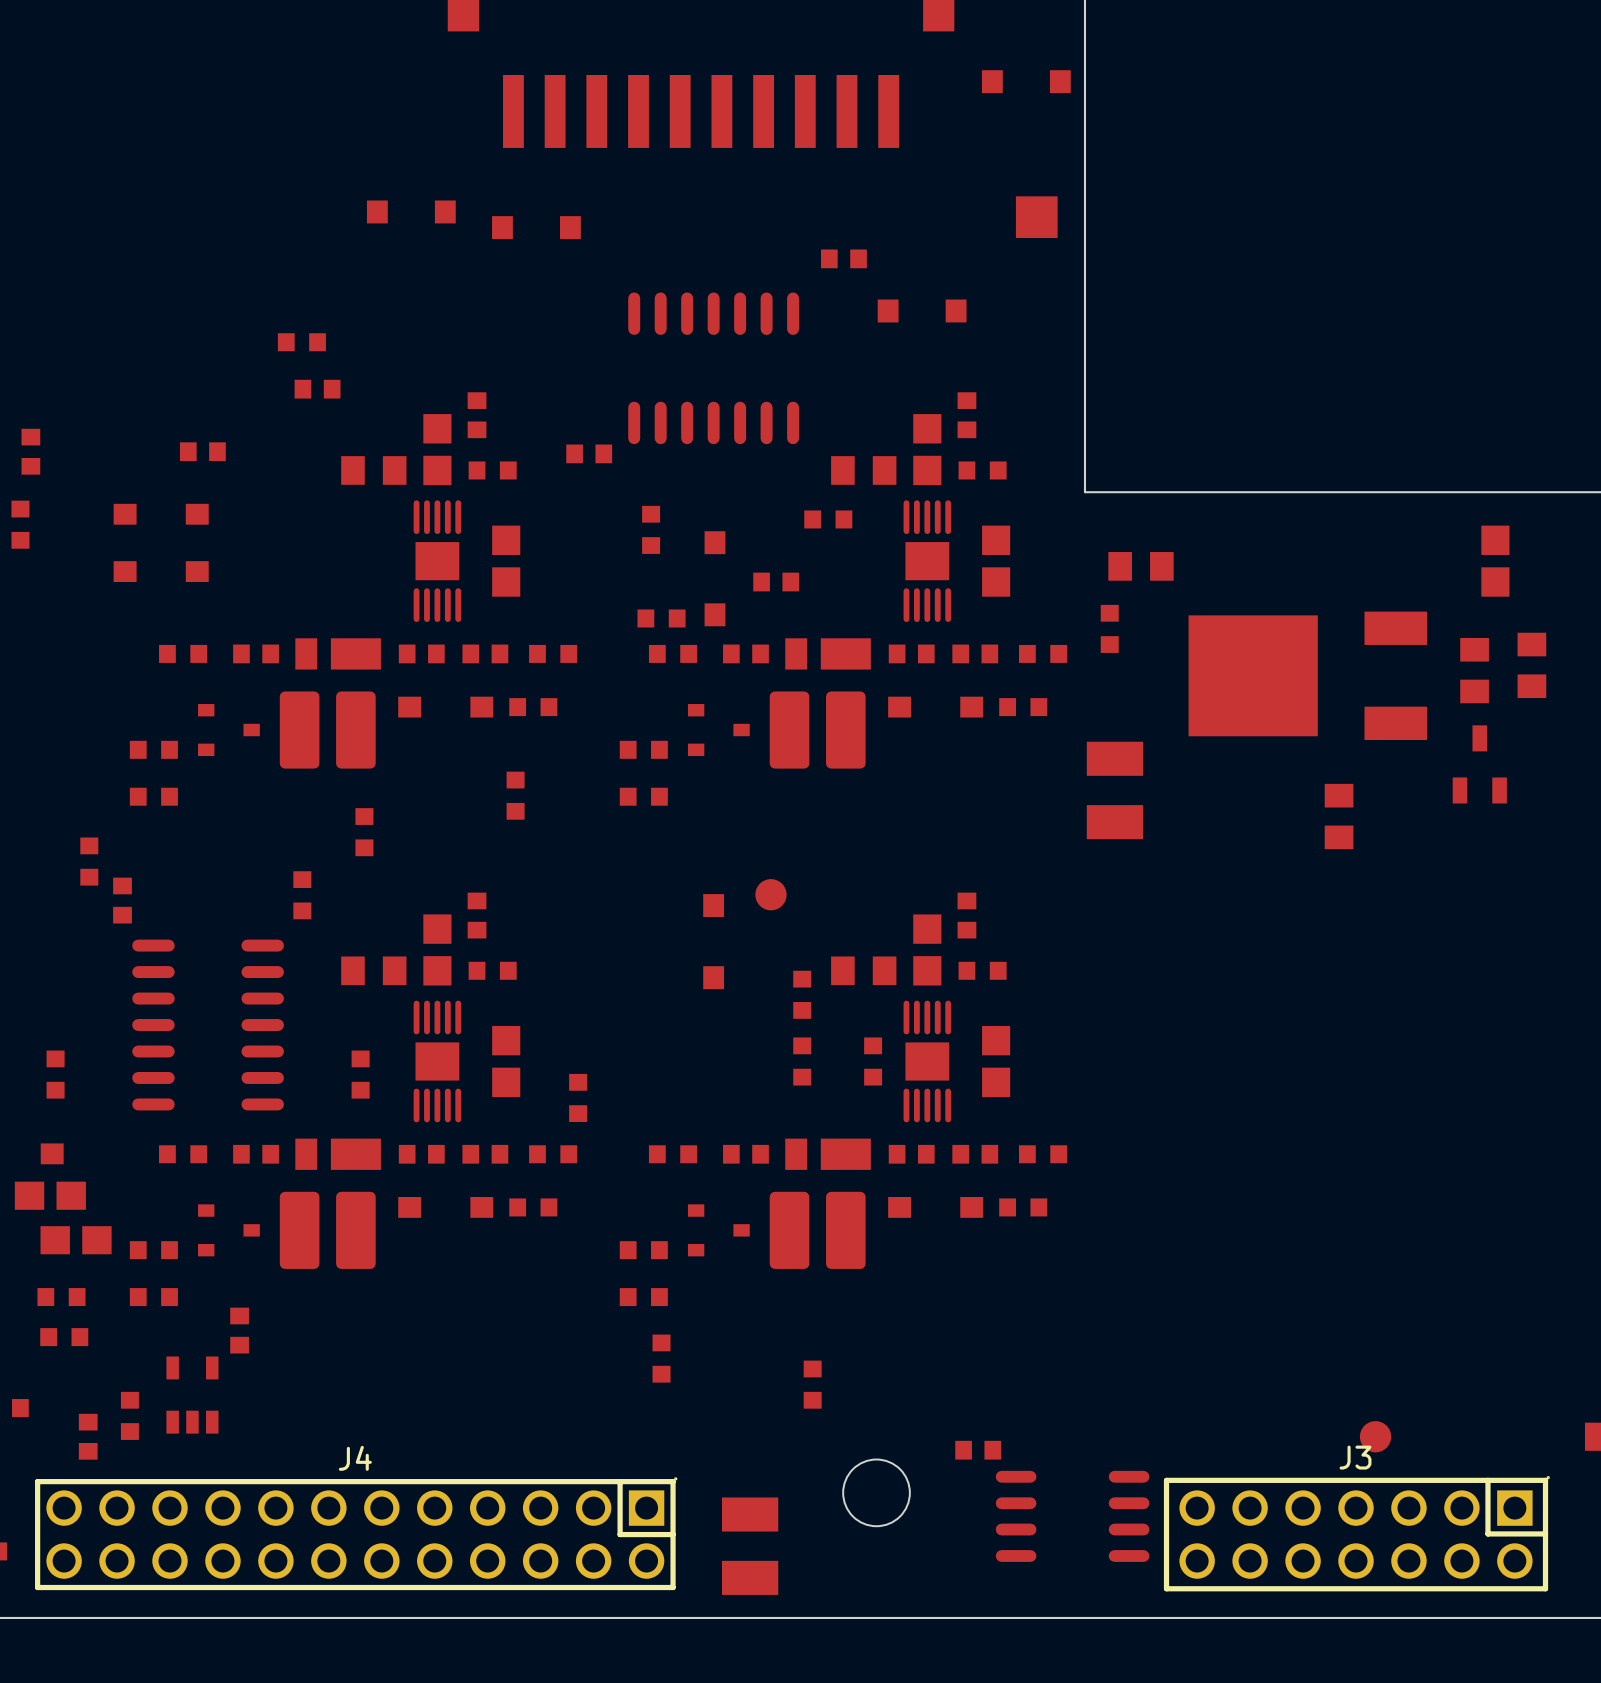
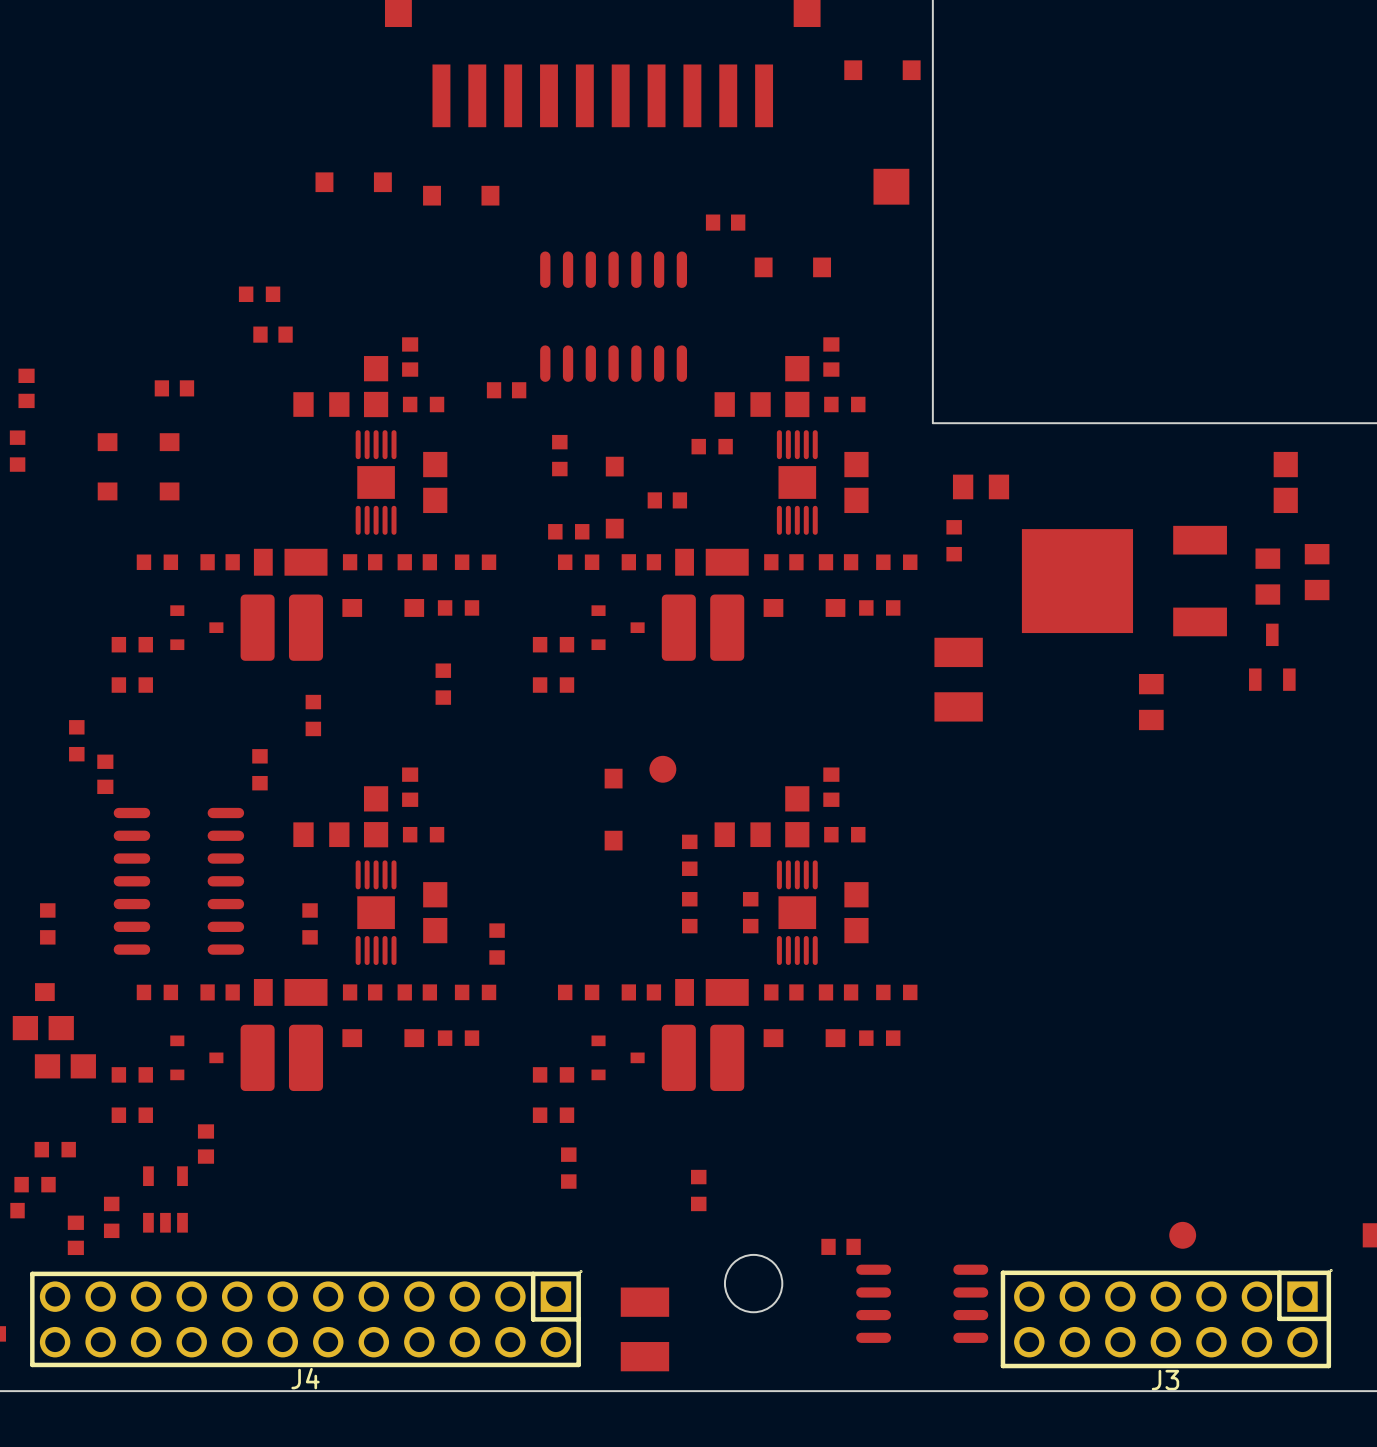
part position: (61, 1297) -> (35, 1184)
J3 name position: J3 (1355, 1457) -> J3 (1165, 1380)
J4 name position: J4 (355, 1458) -> J4 (305, 1378)

